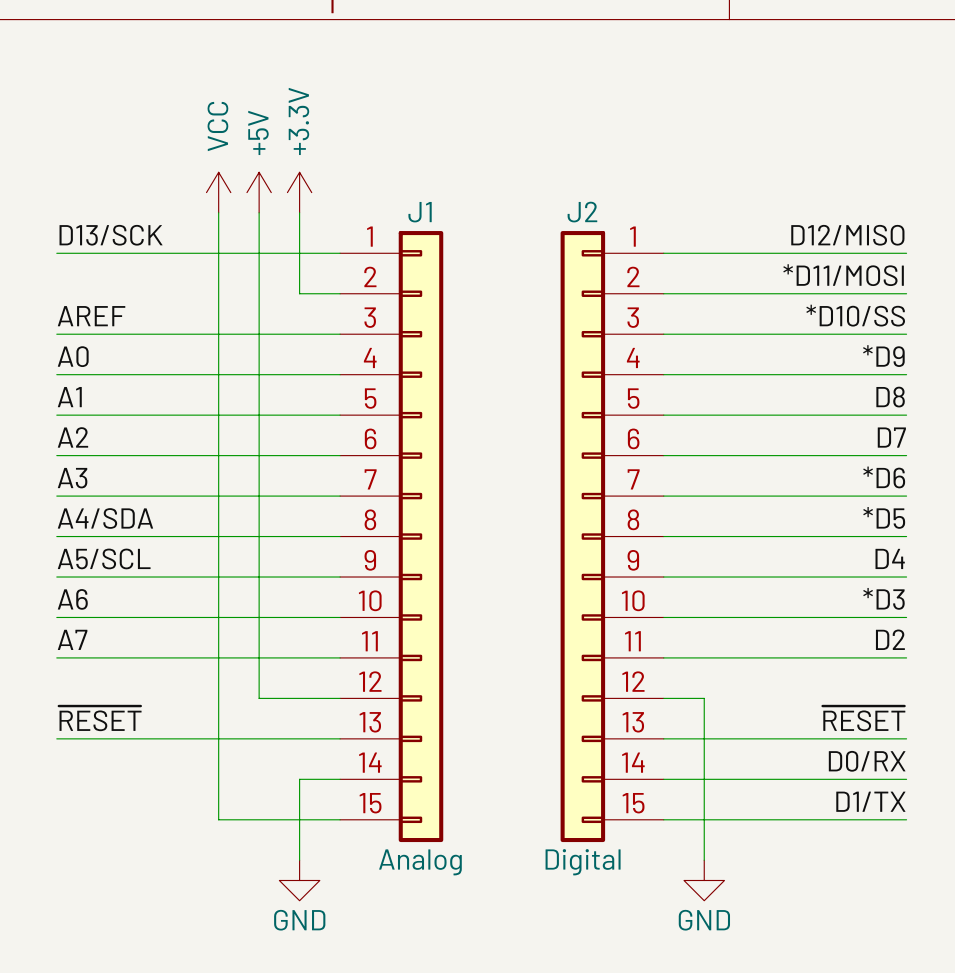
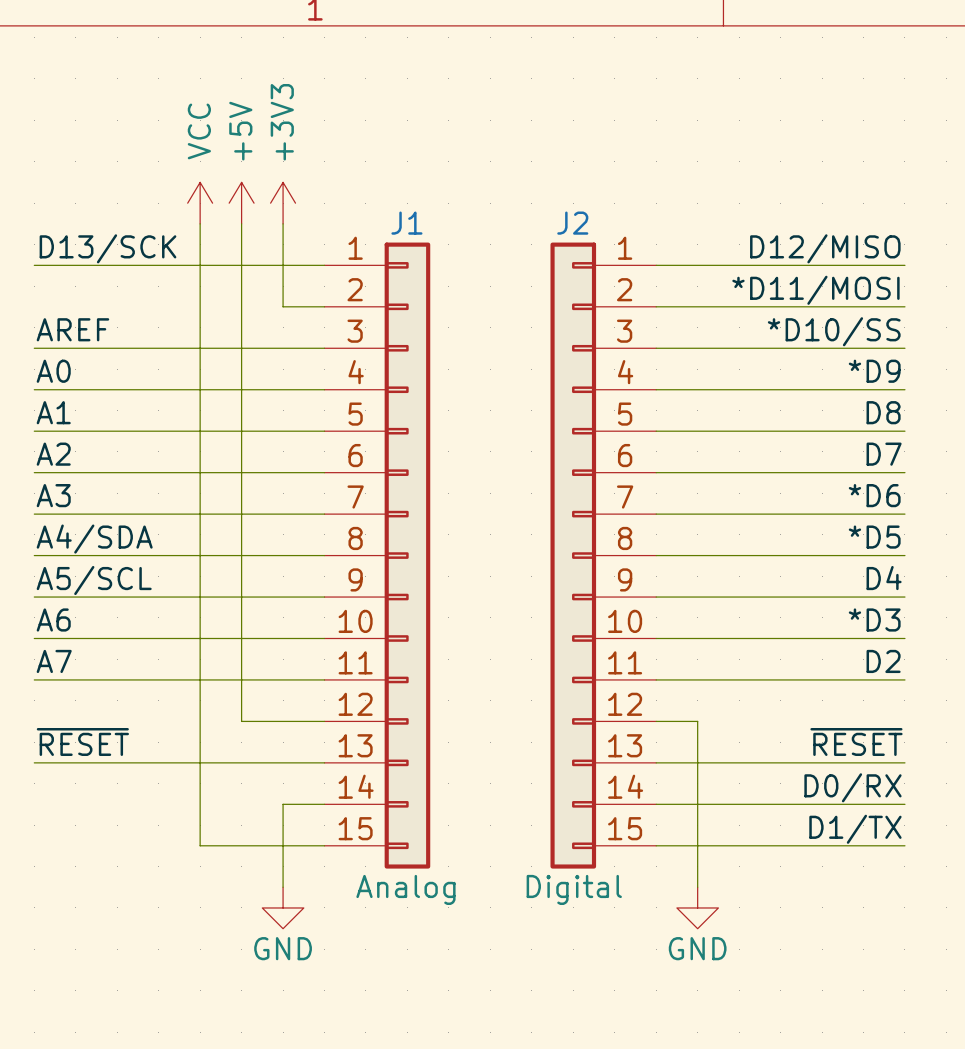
power symbol: +3.3V (299, 192) -> +3V3 (283, 203)

